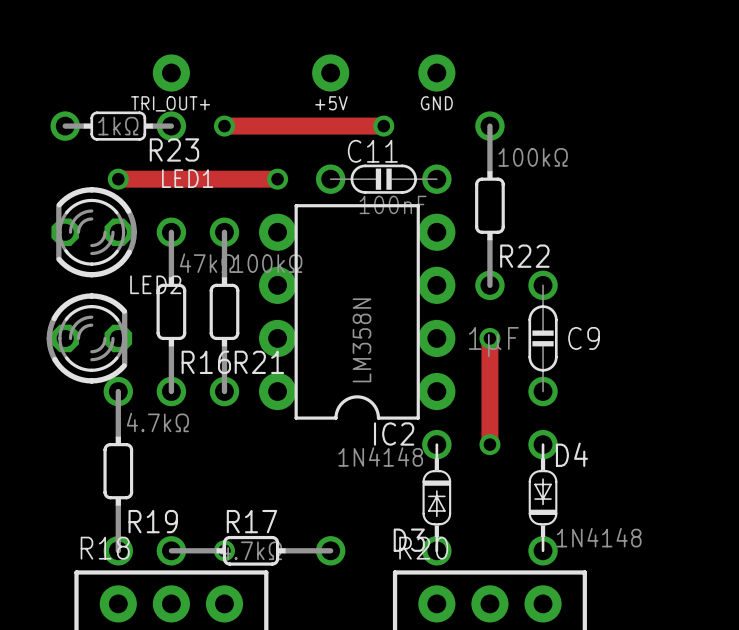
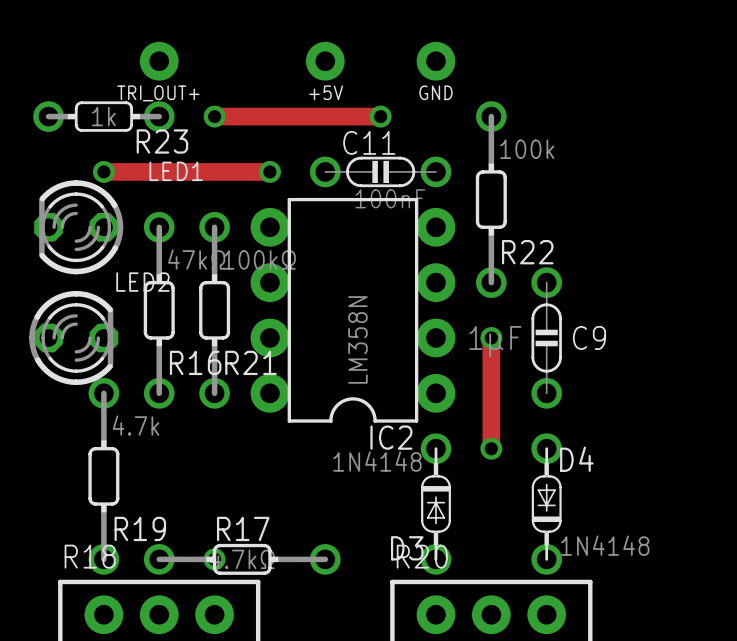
R23 value: 1kΩ (118, 126) -> 1k (103, 116)
R22 value: 100kΩ (533, 157) -> 100k (527, 149)
R19 value: 4.7kΩ (157, 422) -> 4.7k (136, 425)

